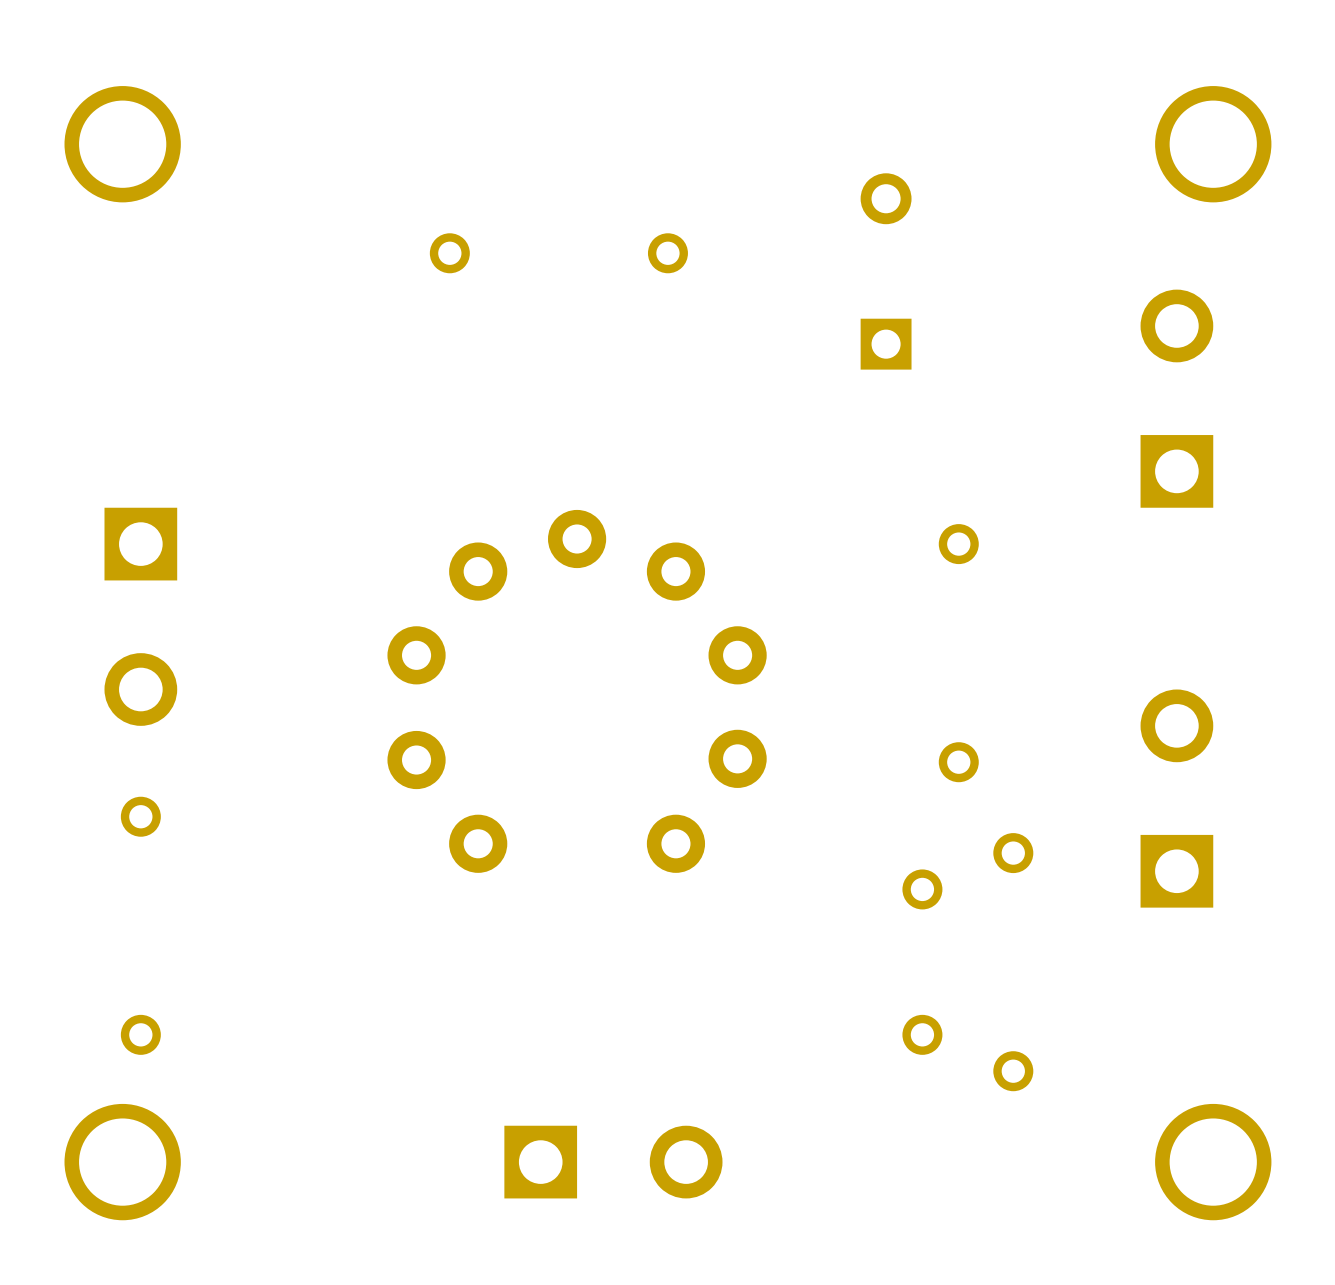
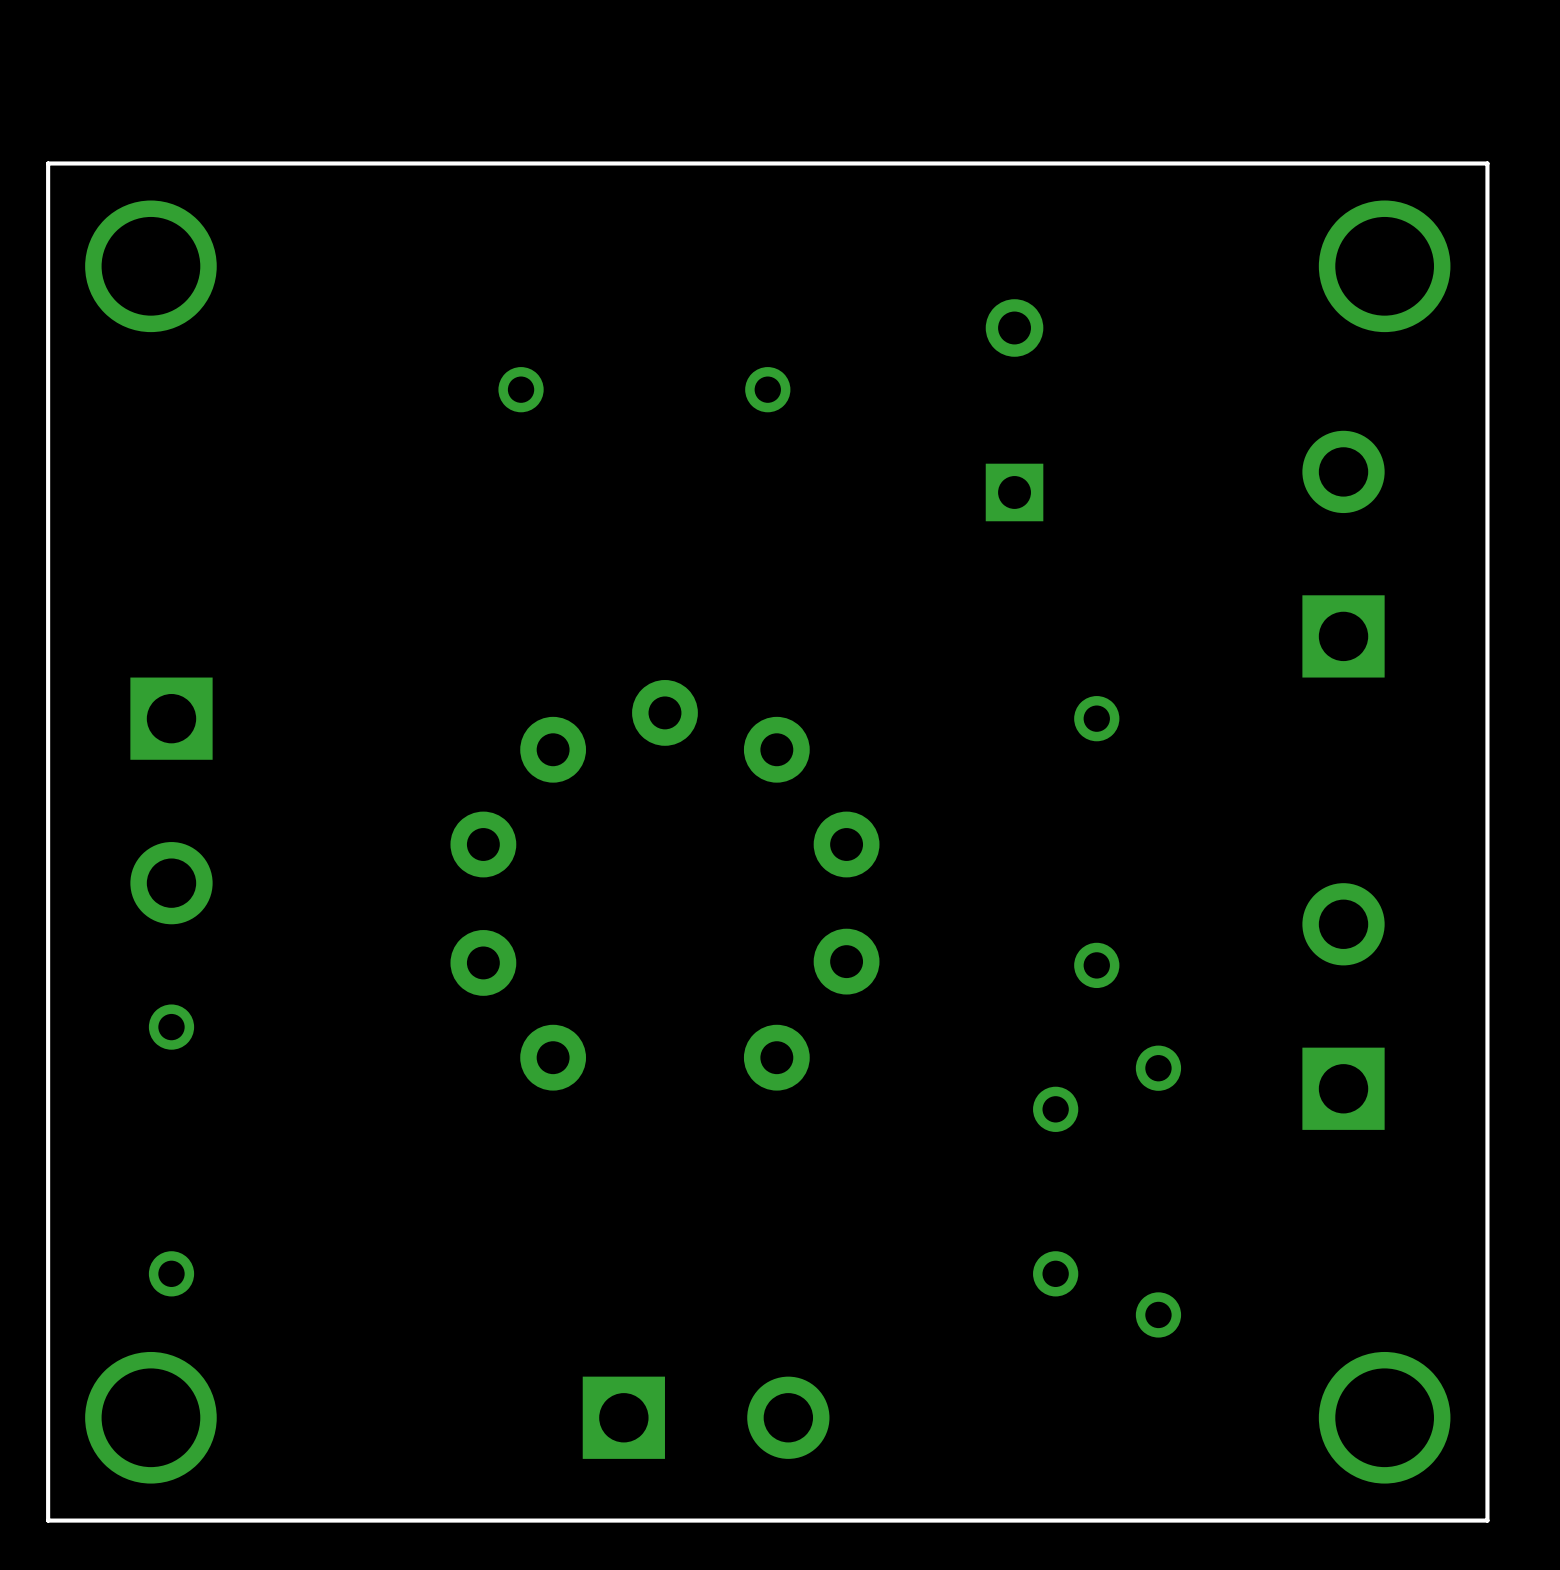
board edge: none -> (1487, 163) (48, 163) (48, 1520) (1487, 1520) (1487, 163)

